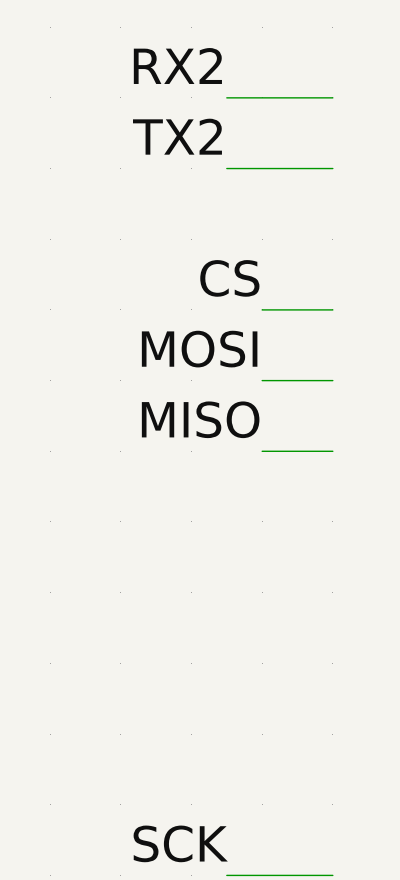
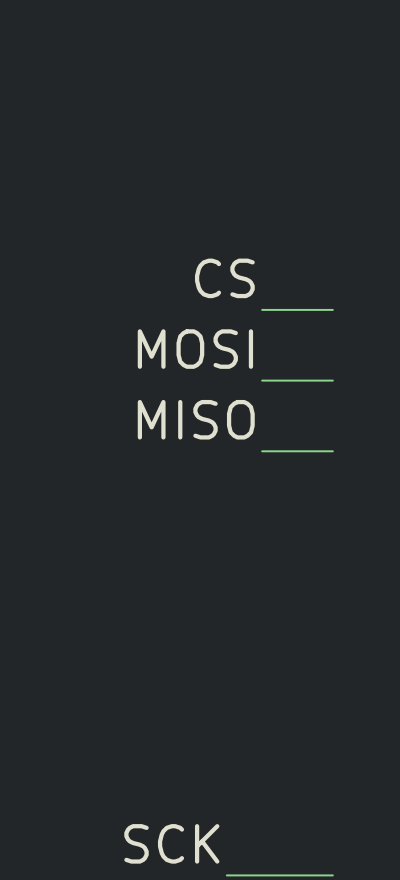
label: RX2 (177, 66) -> none
wire: (226, 97) (332, 97) -> none
label: TX2 (177, 136) -> none
wire: (226, 168) (332, 168) -> none

